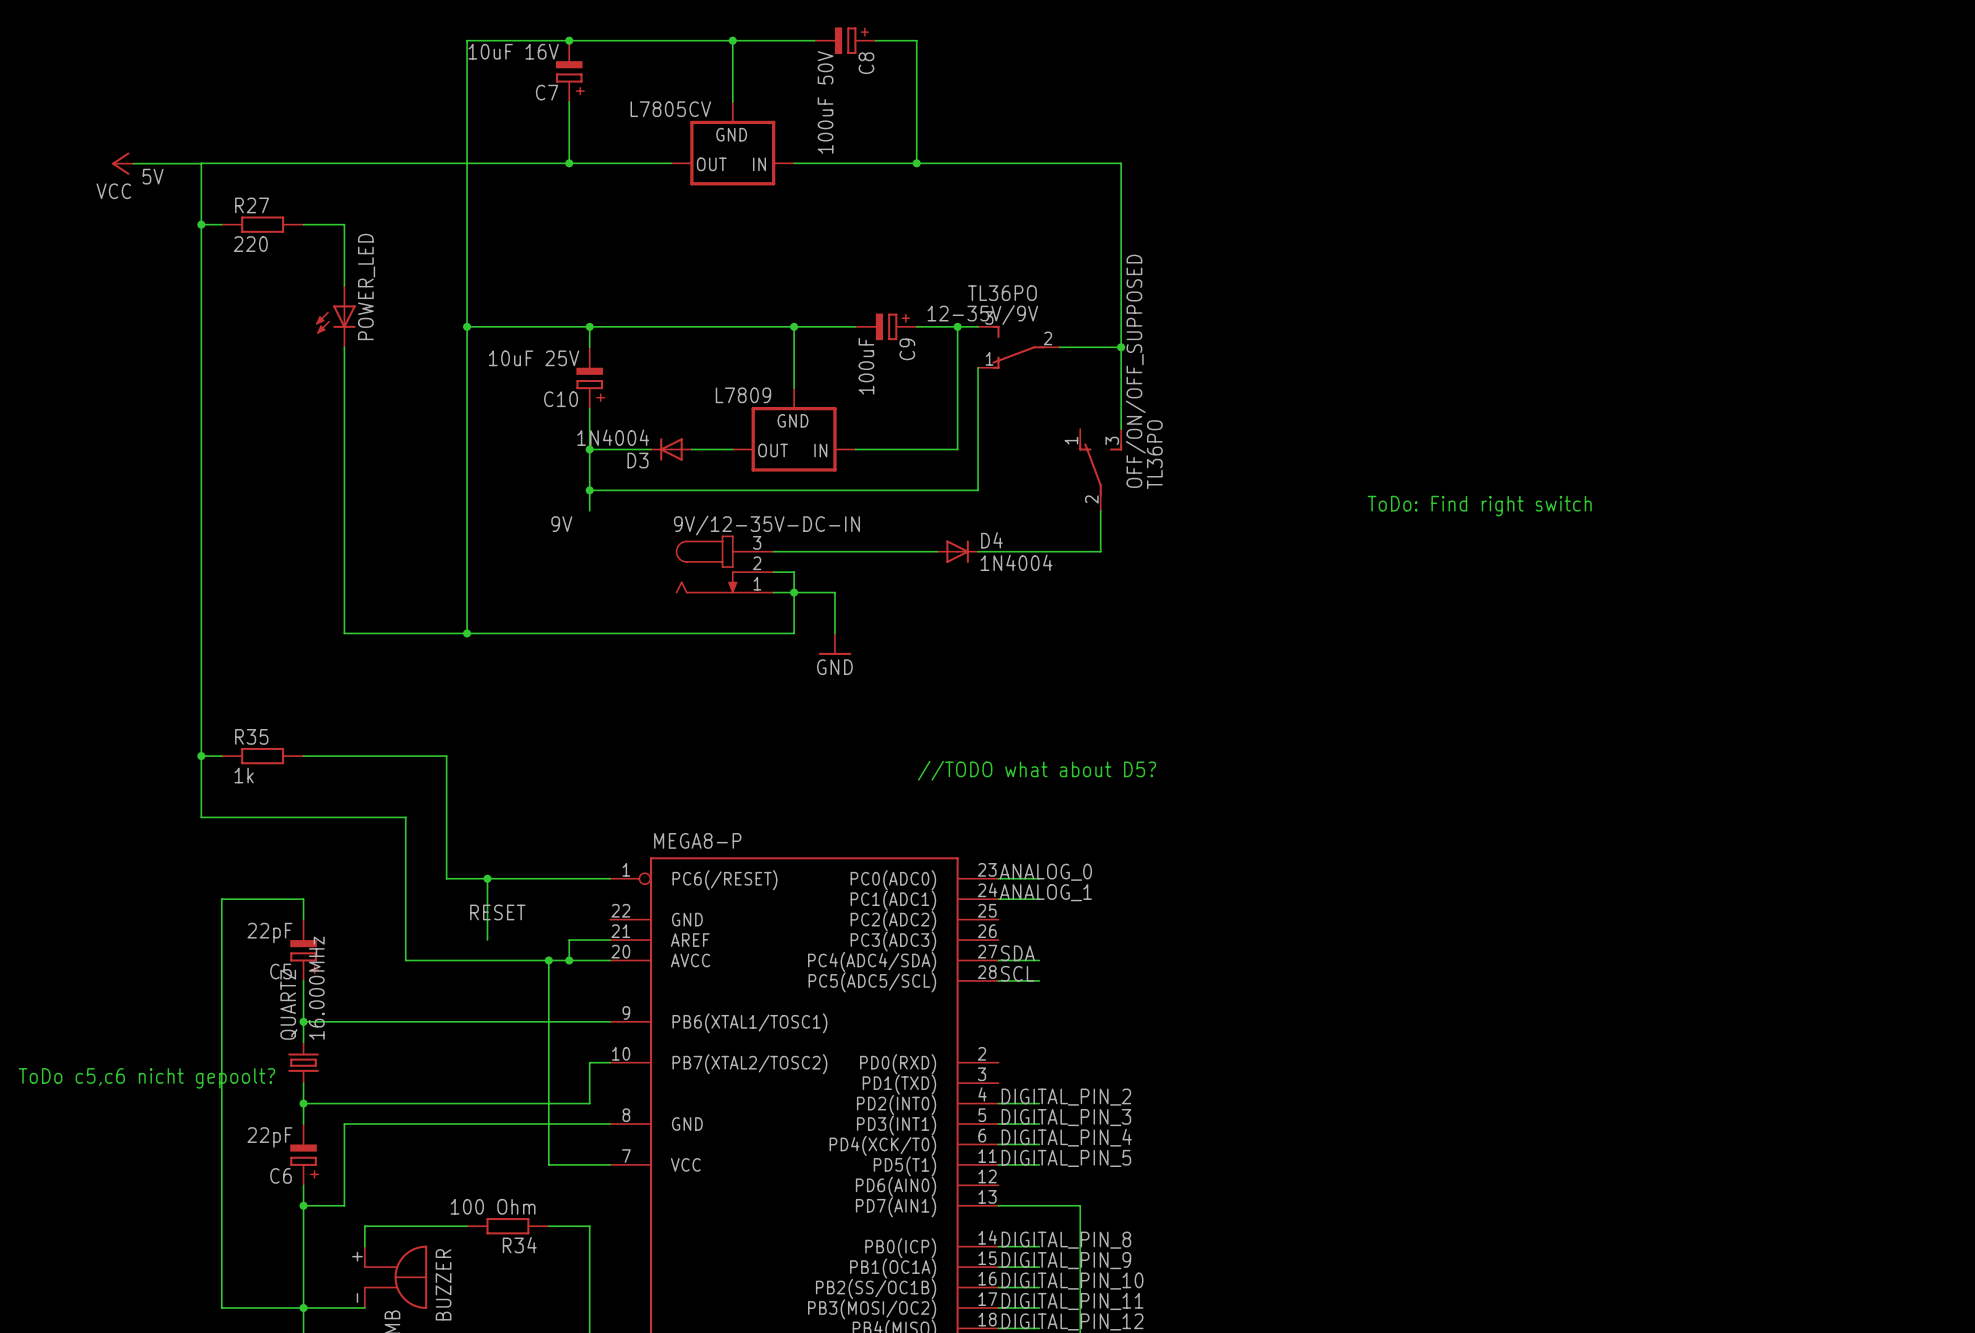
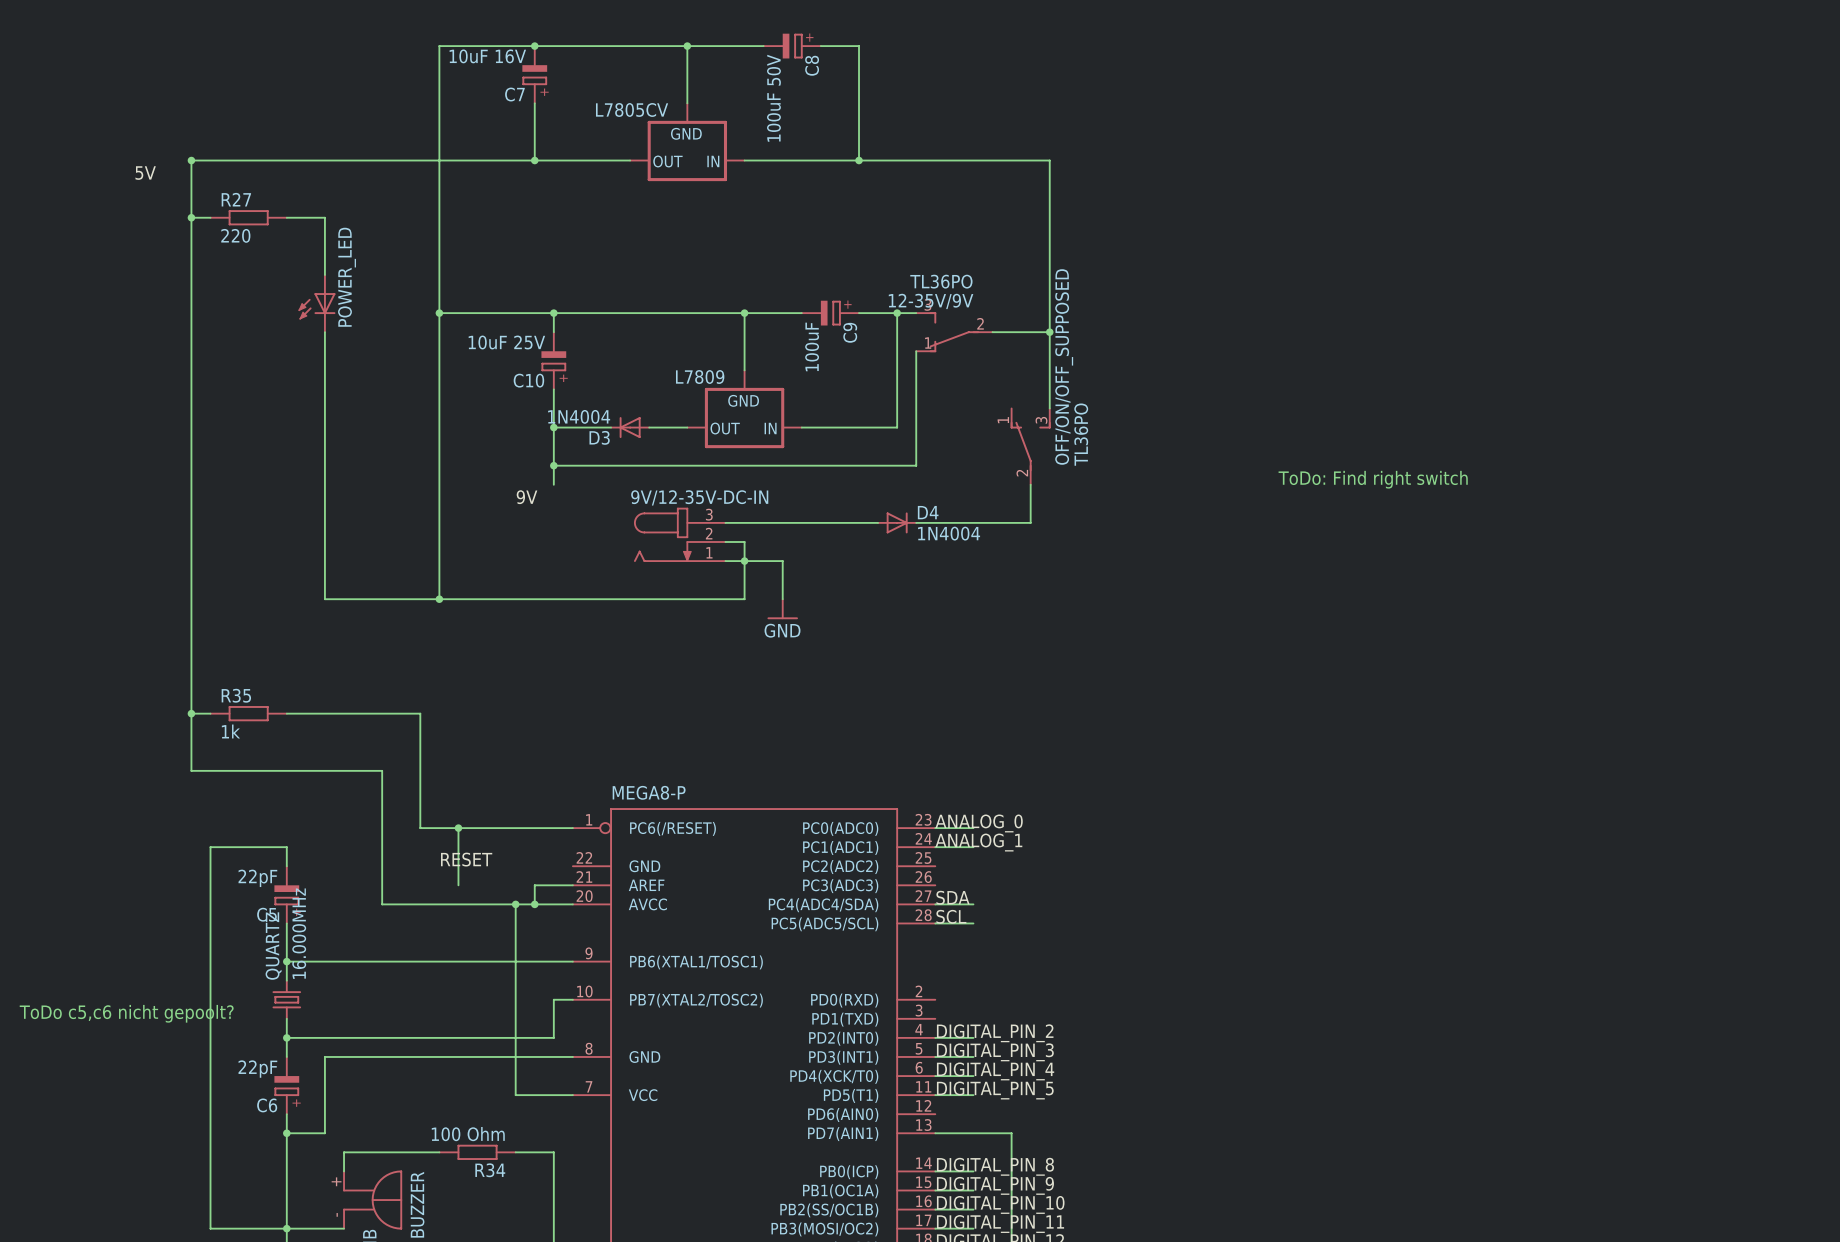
power symbol: VCC (122, 163) -> none
wire: (133, 163) (201, 163) -> none
junction: none -> (191, 160)
text: //TODO what about D5? (1037, 770) -> none

